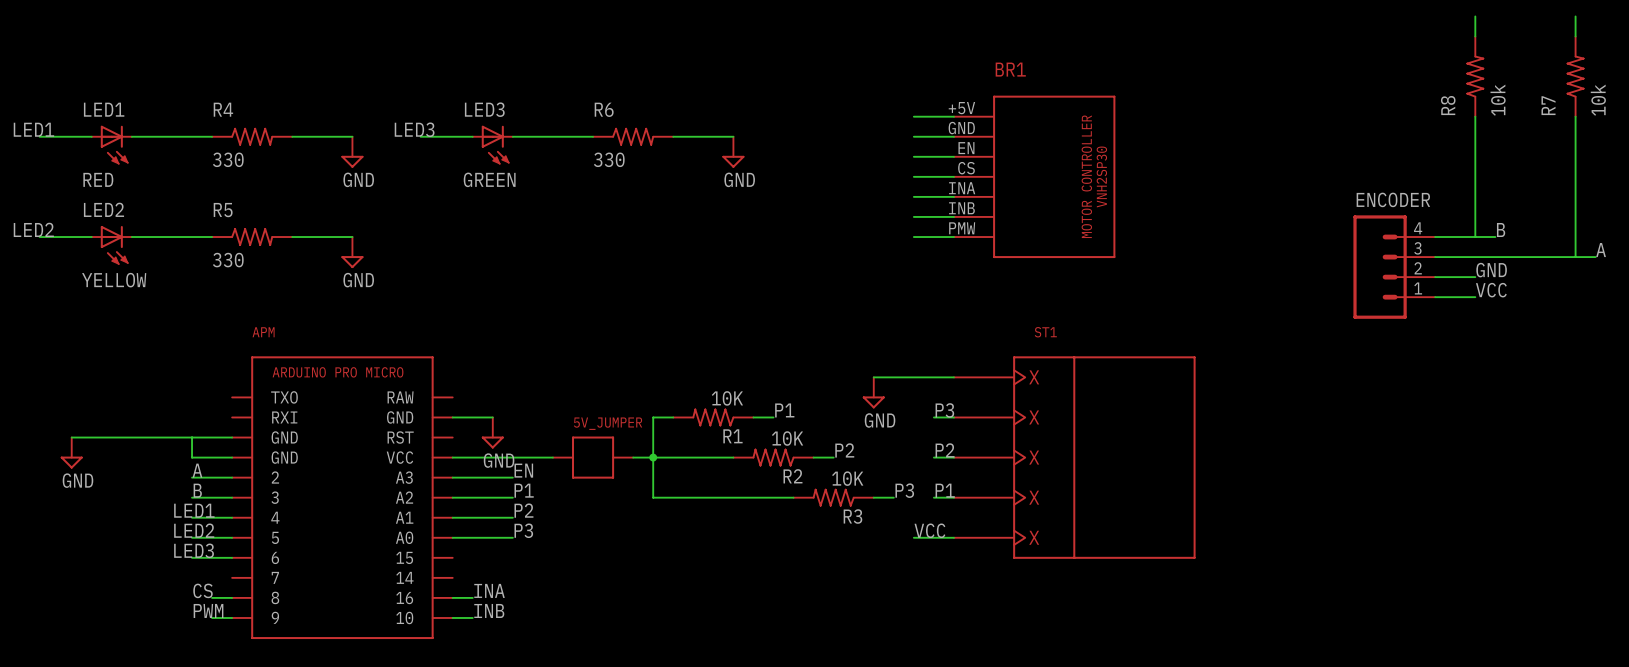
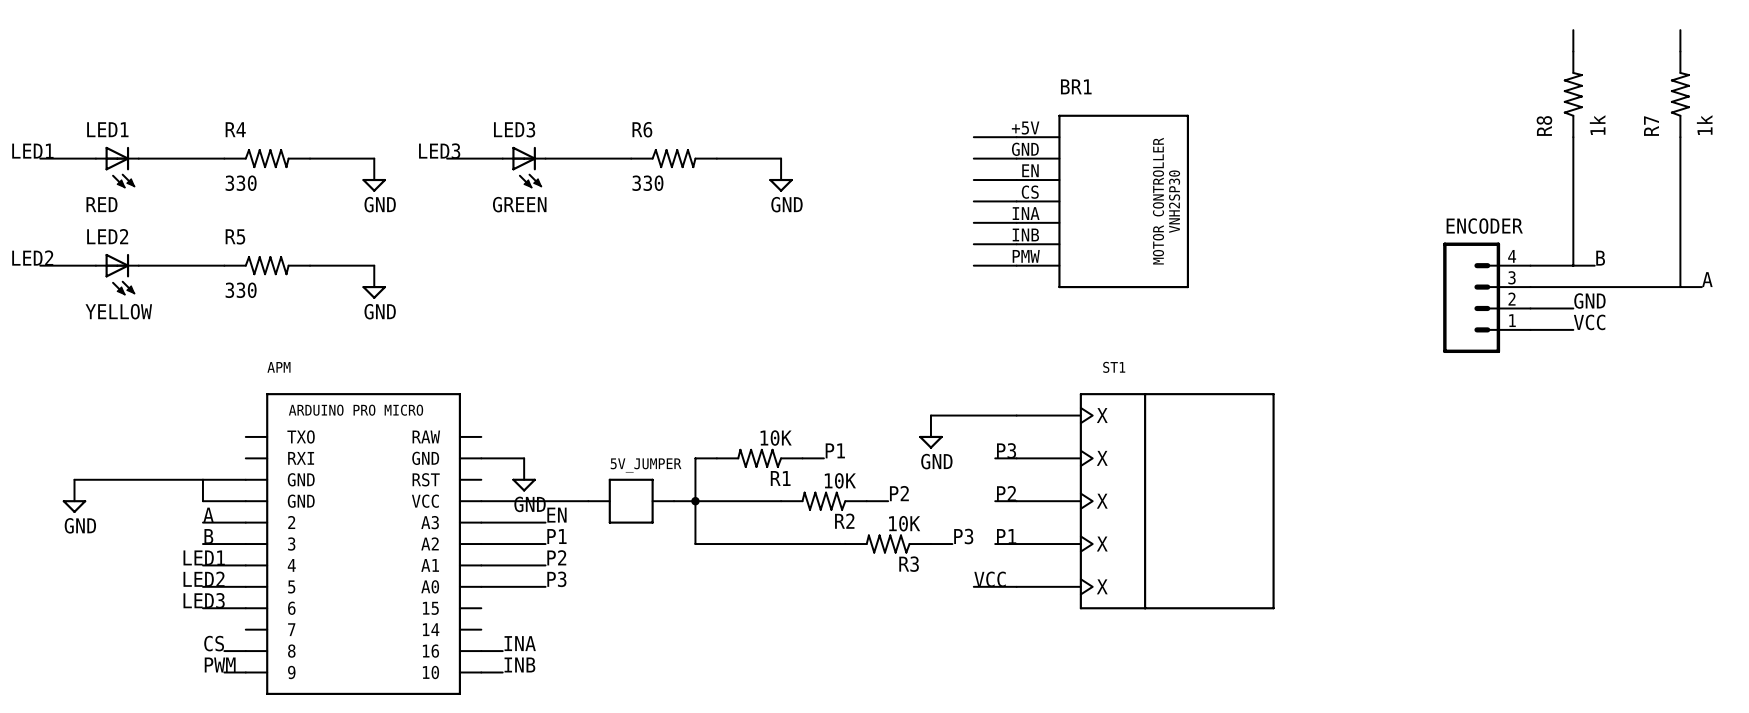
R8 value: 10k (1498, 100) -> 1k (1597, 125)
R7 value: 10k (1598, 100) -> 1k (1704, 125)

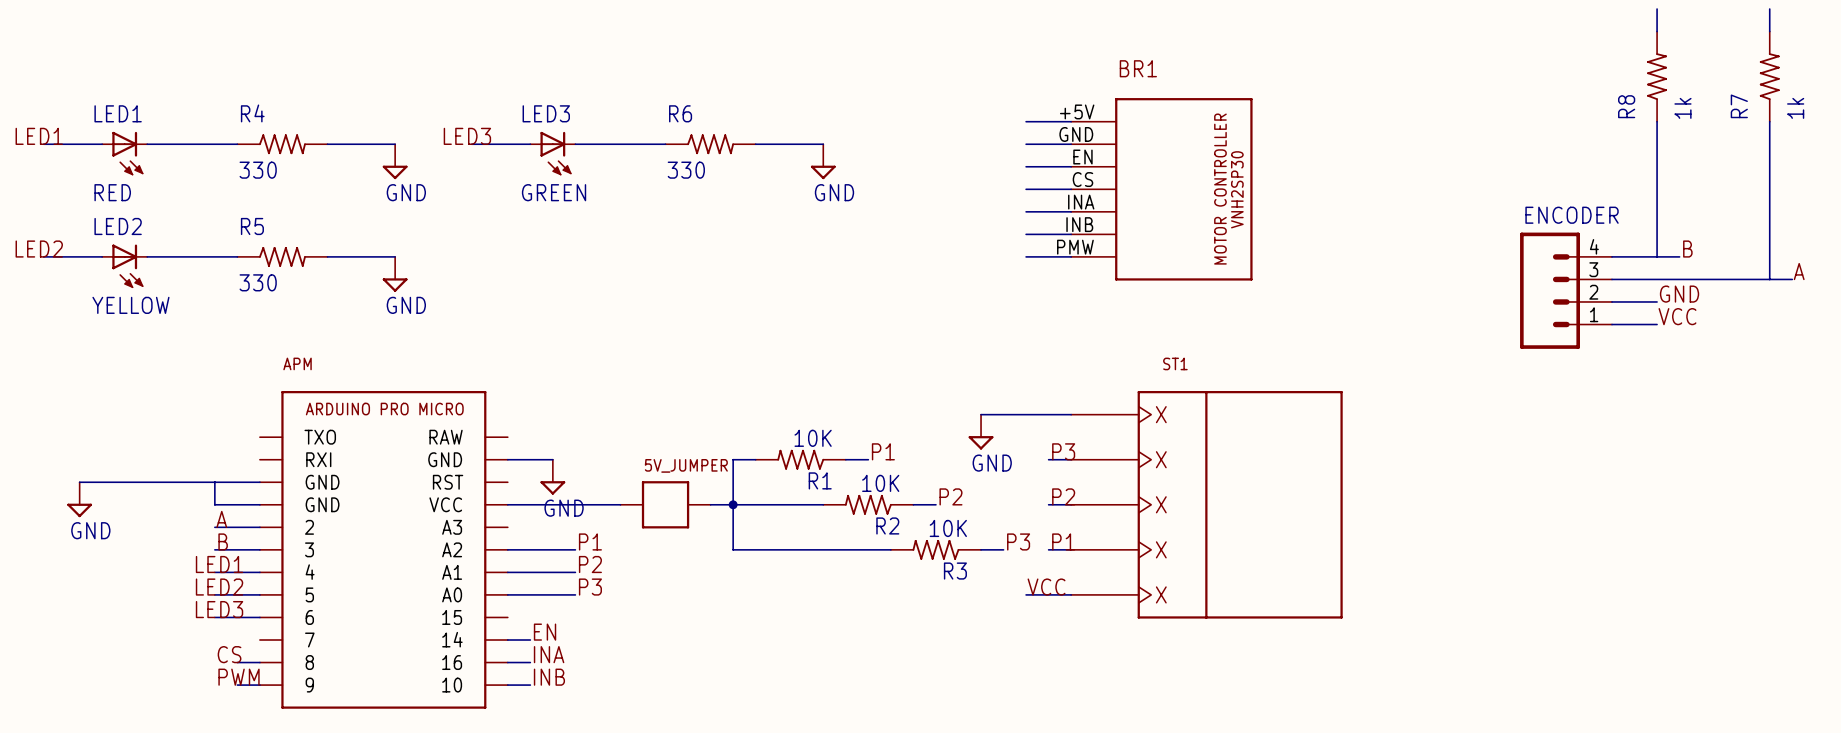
label position: EN (556, 515) -> EN (545, 632)
wire: (481, 522) (545, 522) -> none
wire: none -> (507, 640) (530, 640)

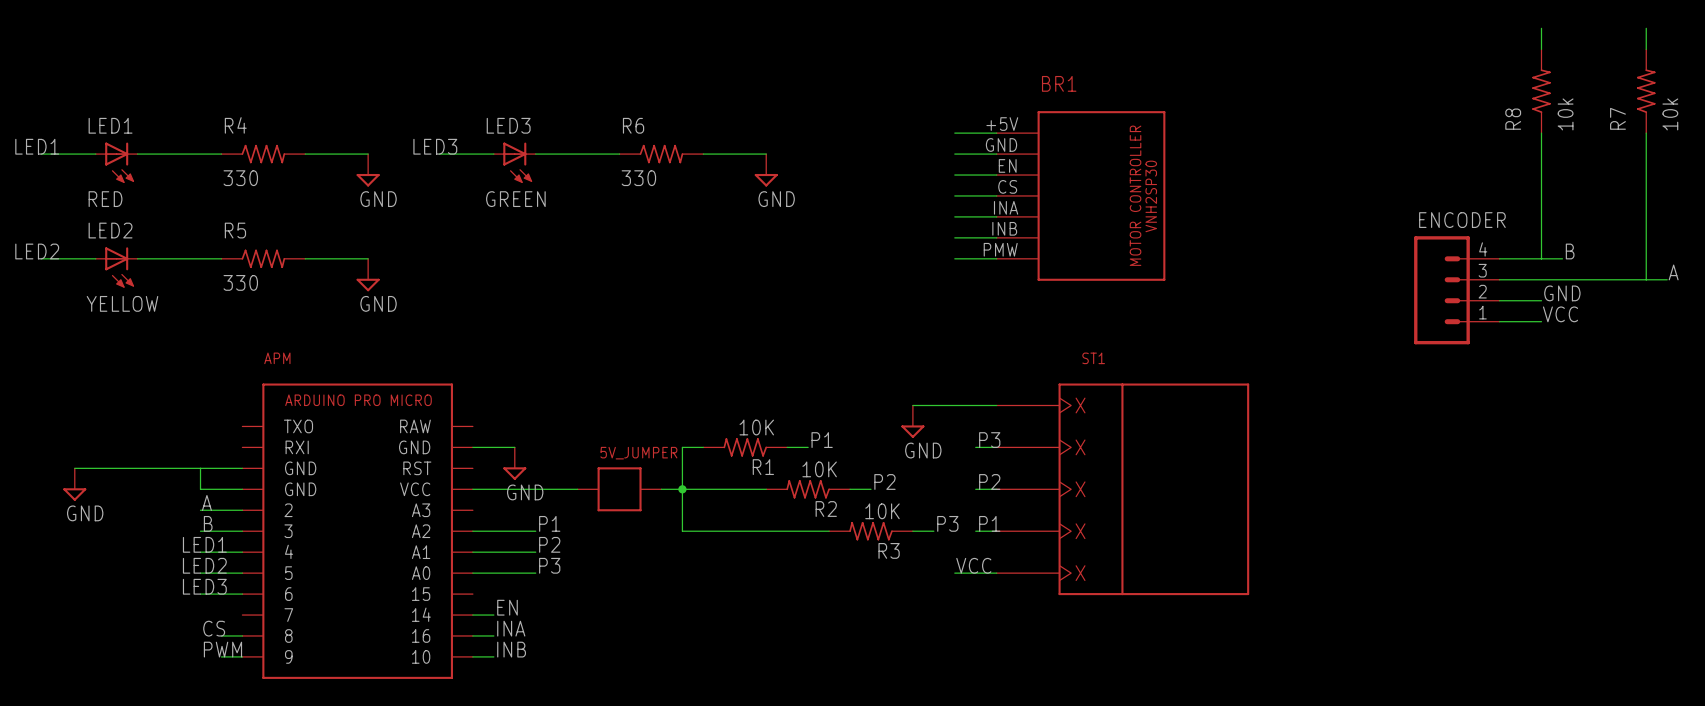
R8 value: 1k (1682, 108) -> 10k (1565, 114)
R7 value: 1k (1795, 108) -> 10k (1670, 114)

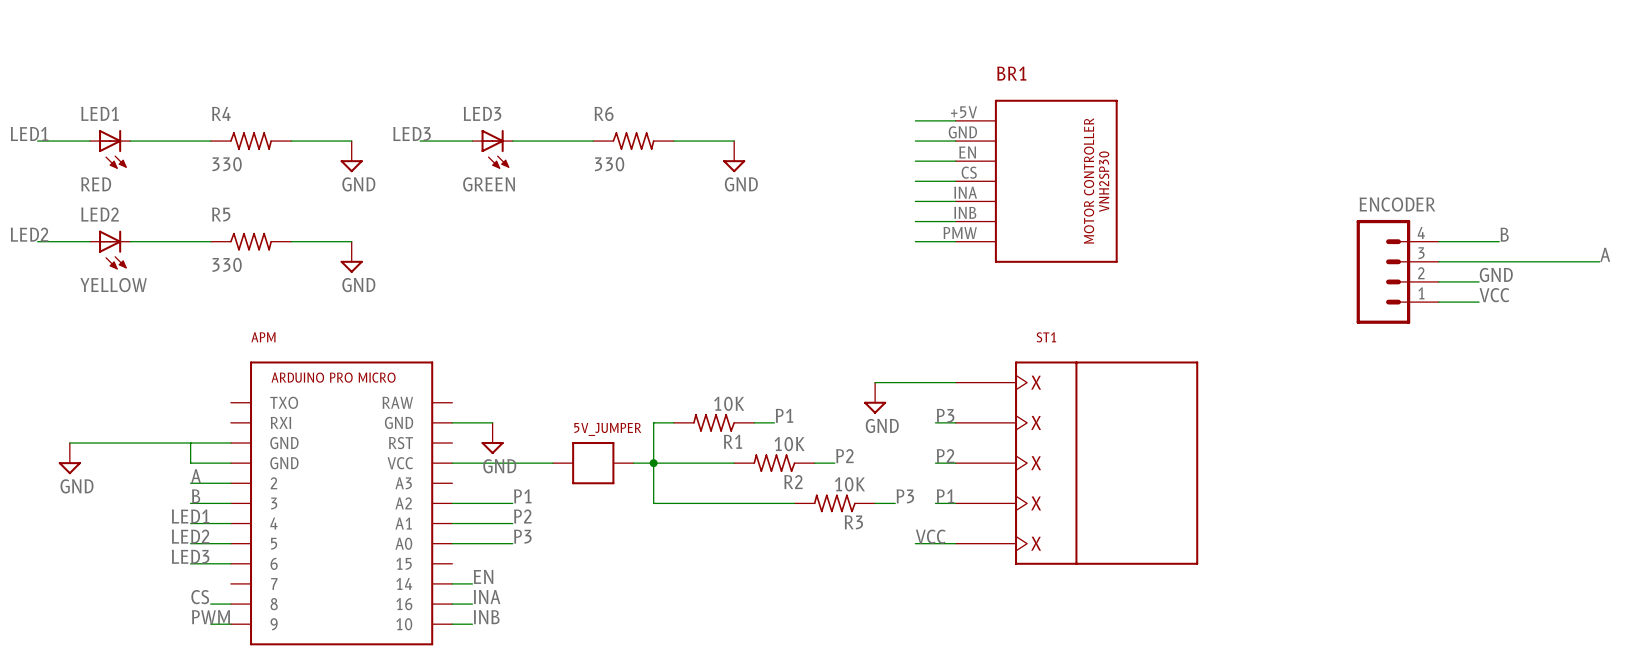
wire: (1541, 28) (1541, 49) -> none
wire: (1646, 28) (1646, 49) -> none
R8: 10k (1541, 91) -> none
R7: 10k (1646, 91) -> none
wire: (1541, 133) (1541, 258) -> none
wire: (1646, 133) (1646, 279) -> none

